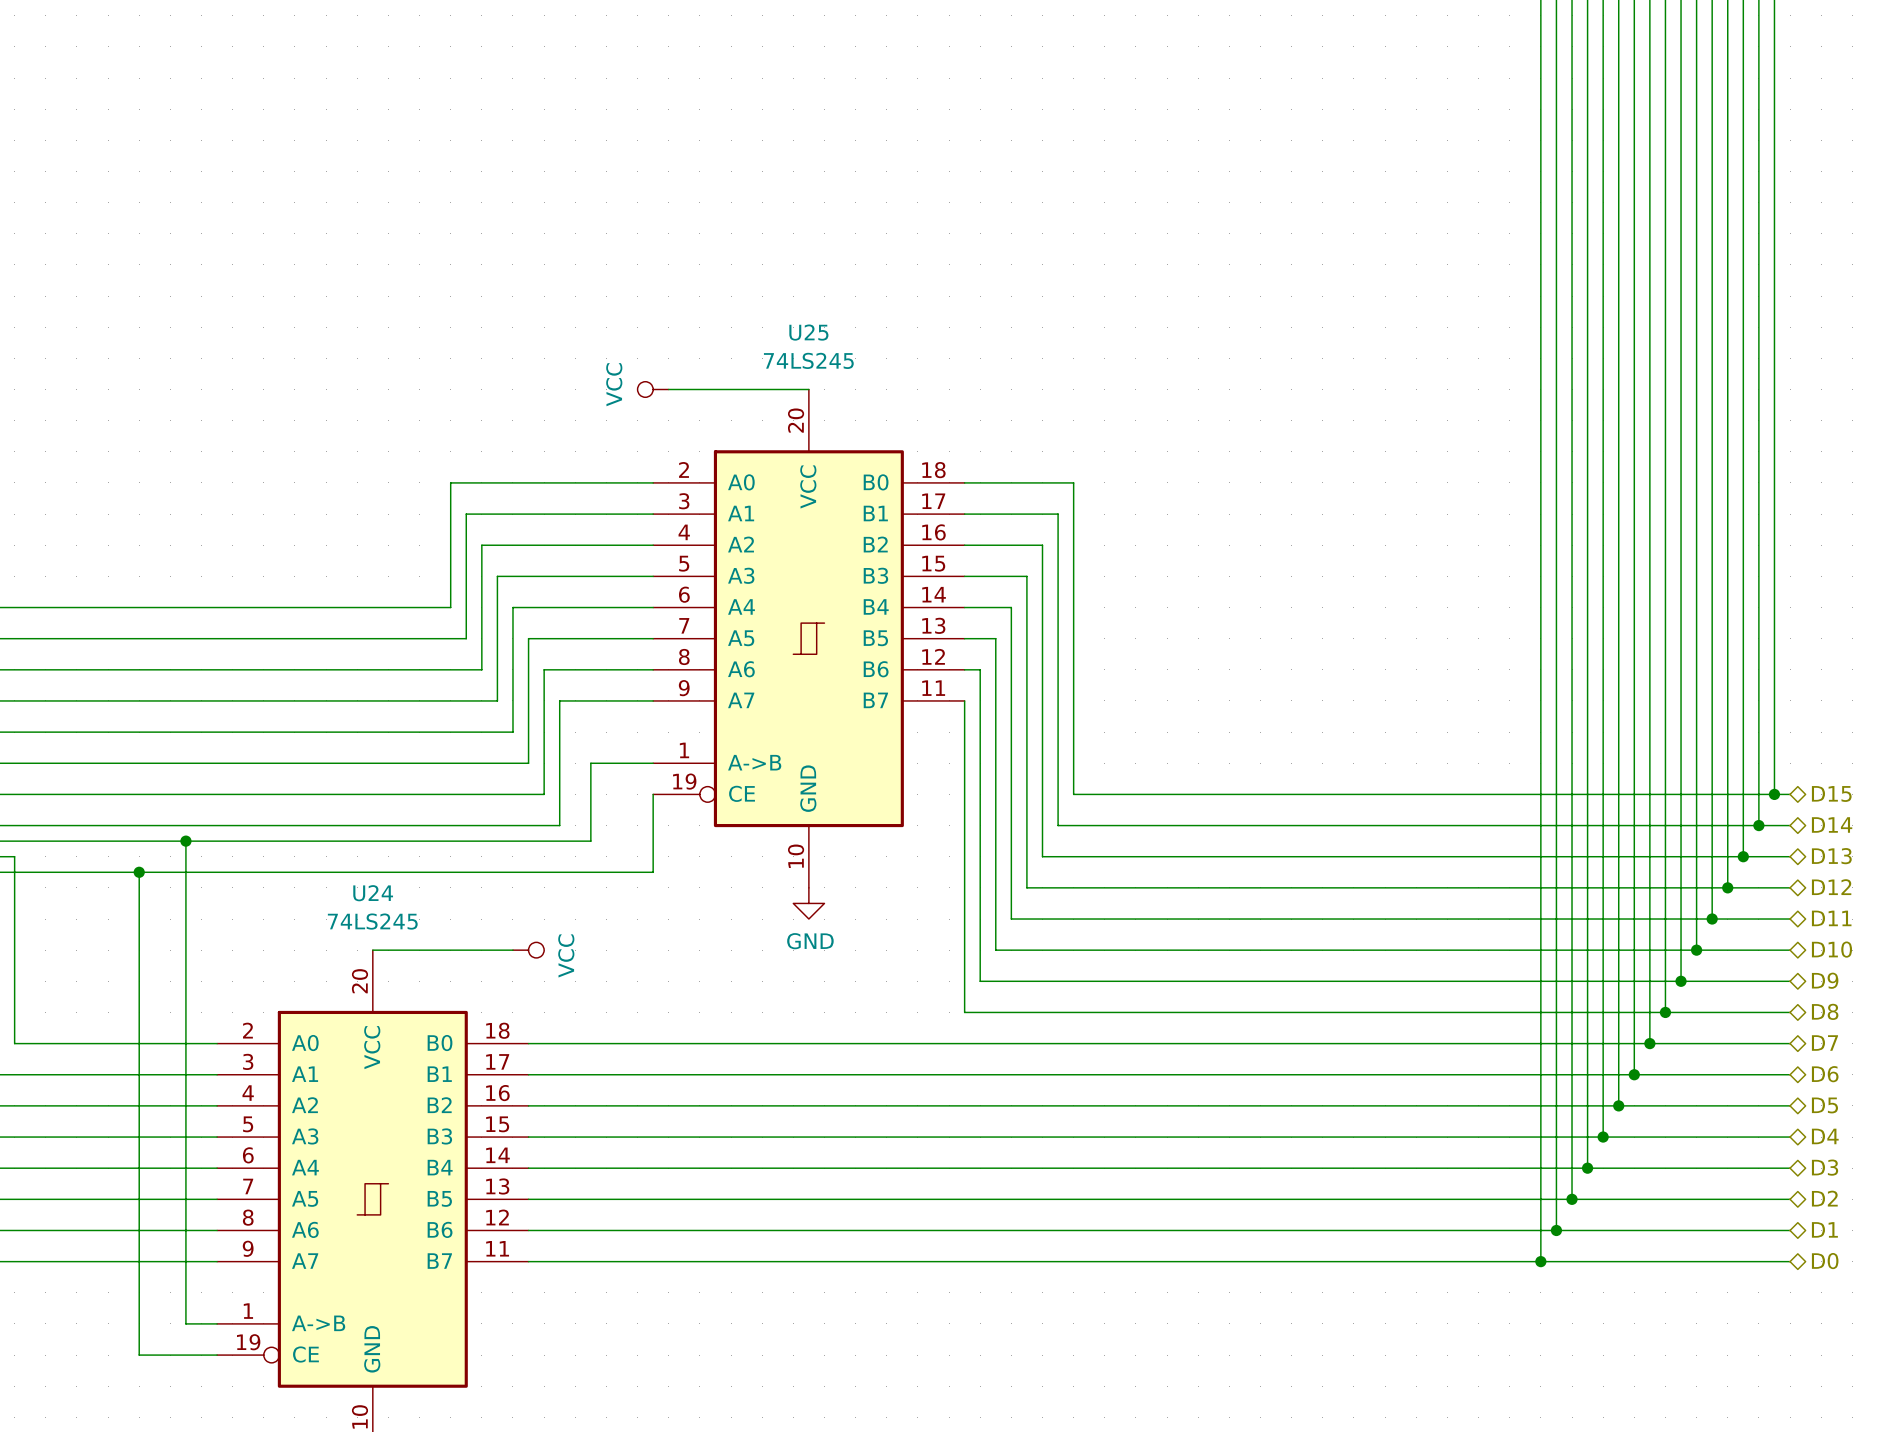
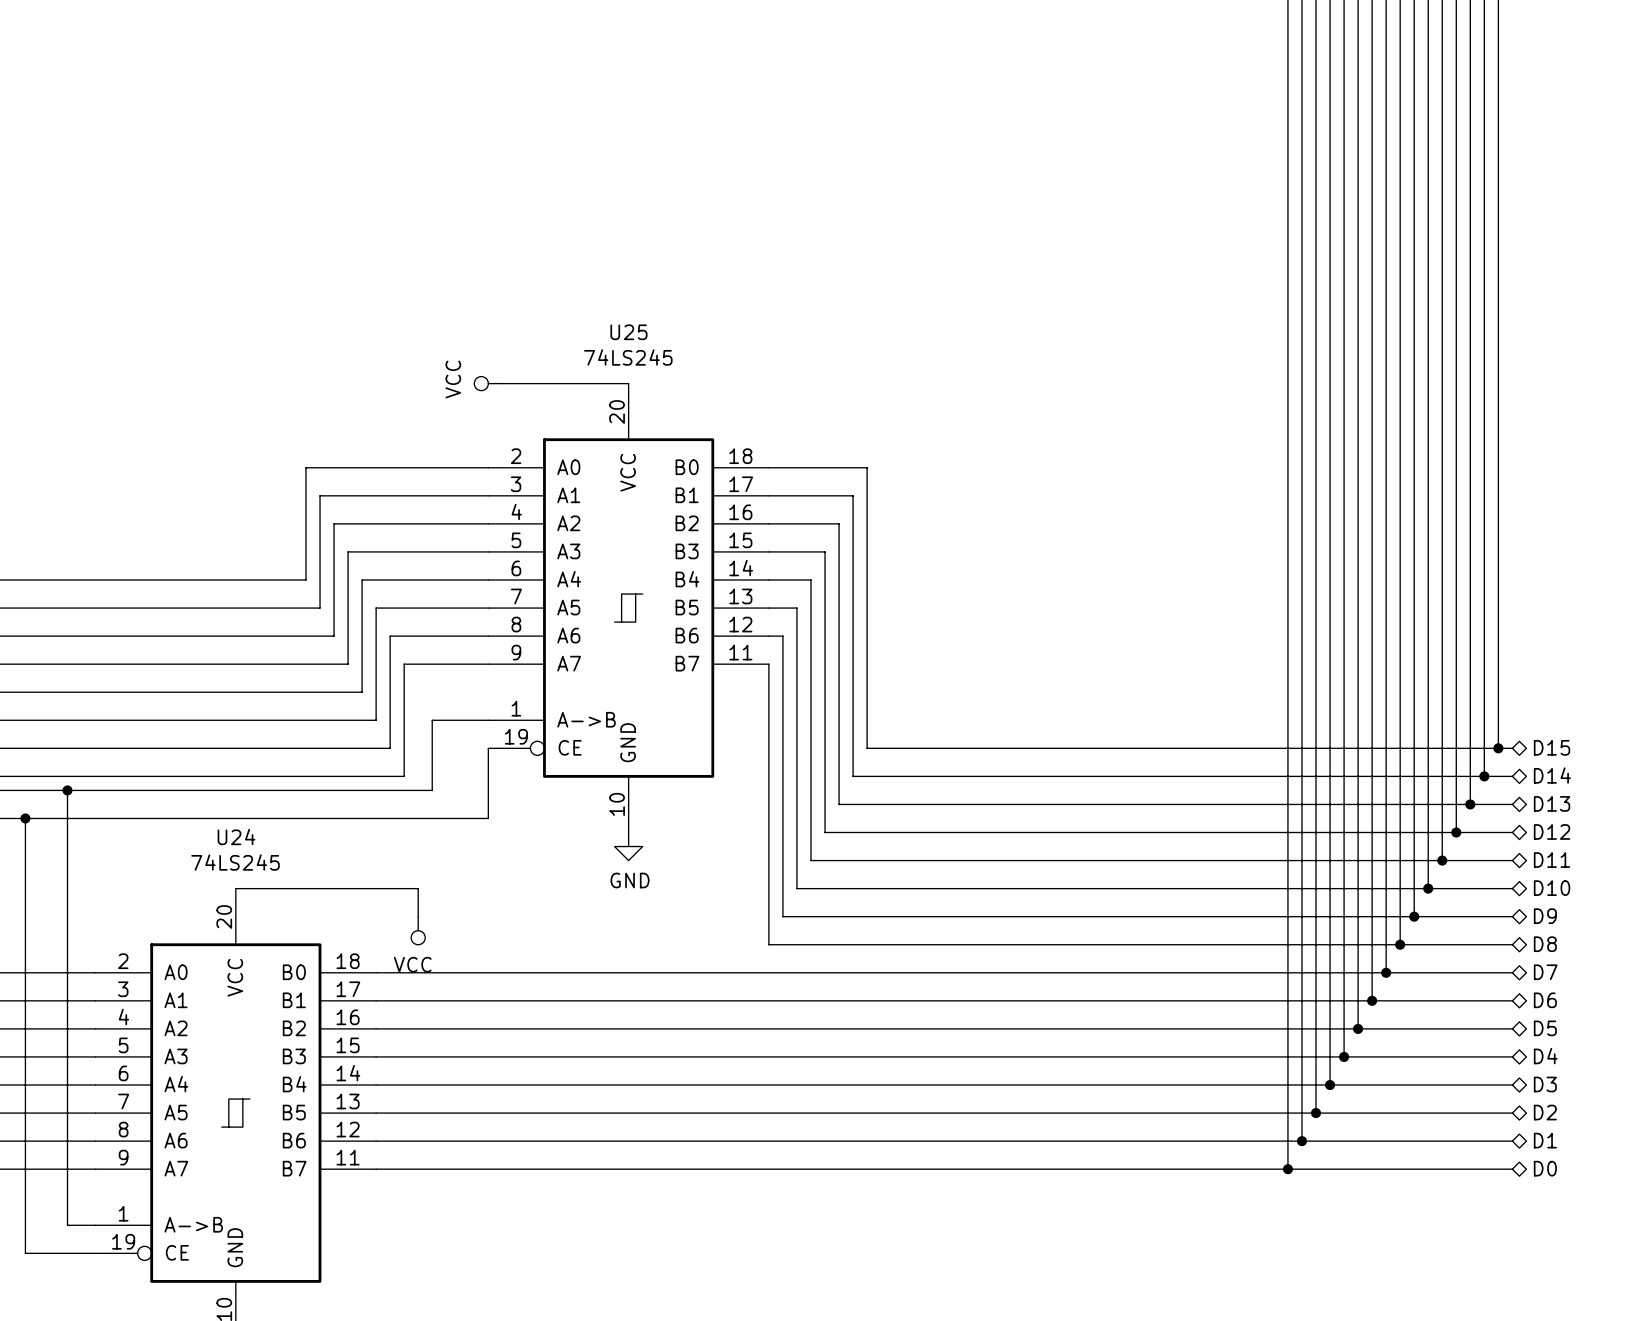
wire: none -> (362, 888) (418, 888) (418, 916)
power symbol rotation: 0° (528, 950) -> 90° clockwise (418, 930)
power symbol position: VCC (528, 950) -> VCC (418, 930)

